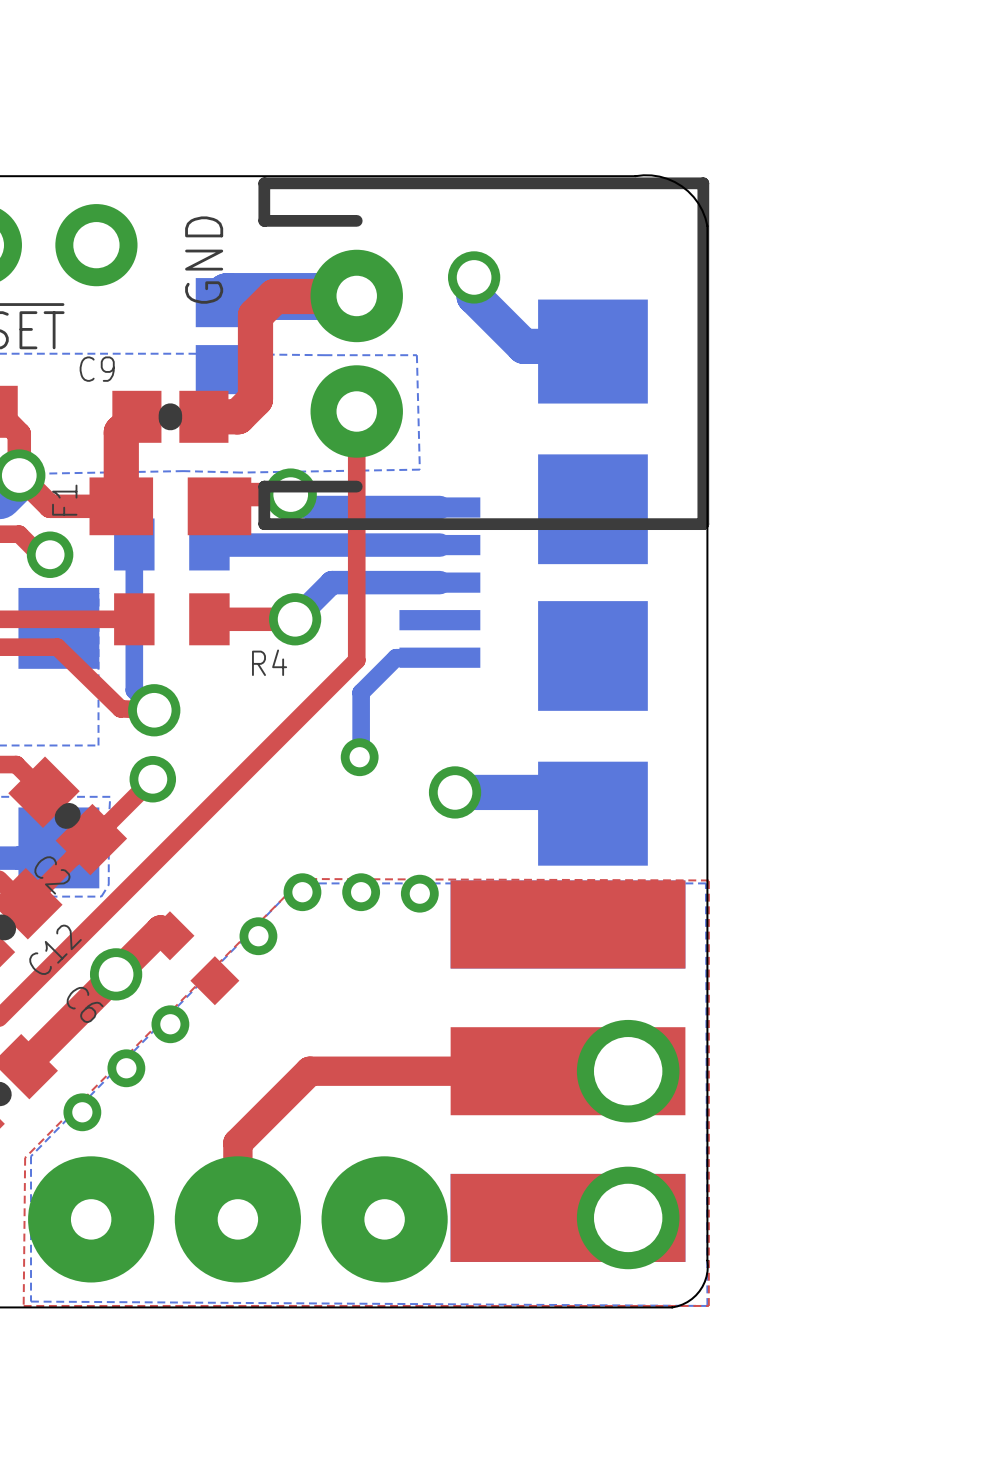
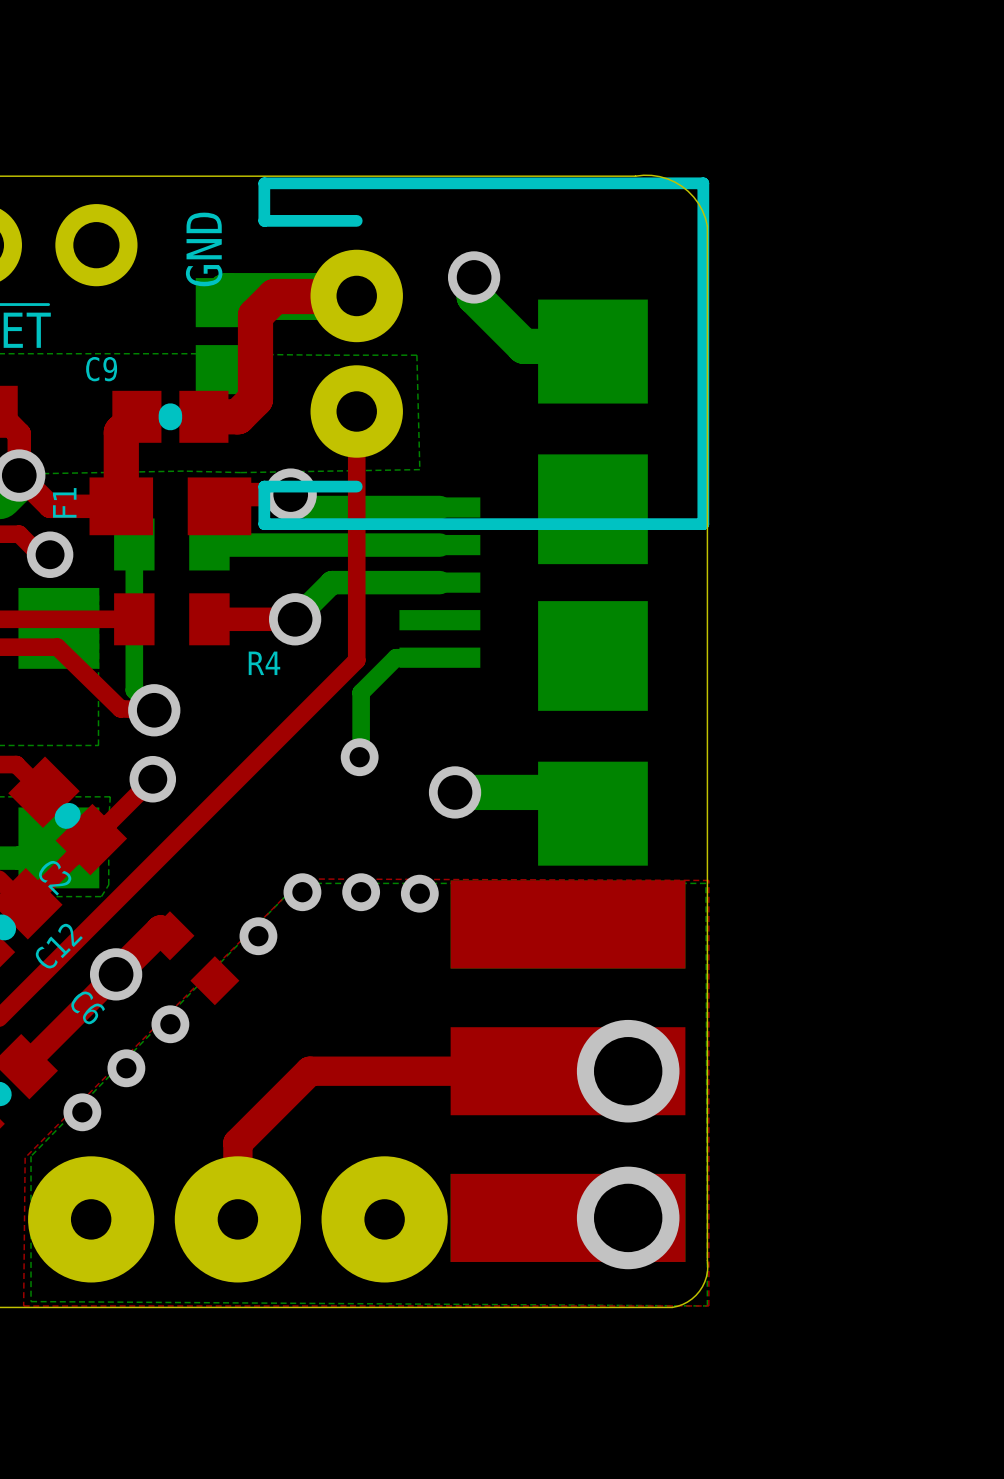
top track width: thick (116, 974) (28, 1062) -> thin (116, 974) (28, 1062)

